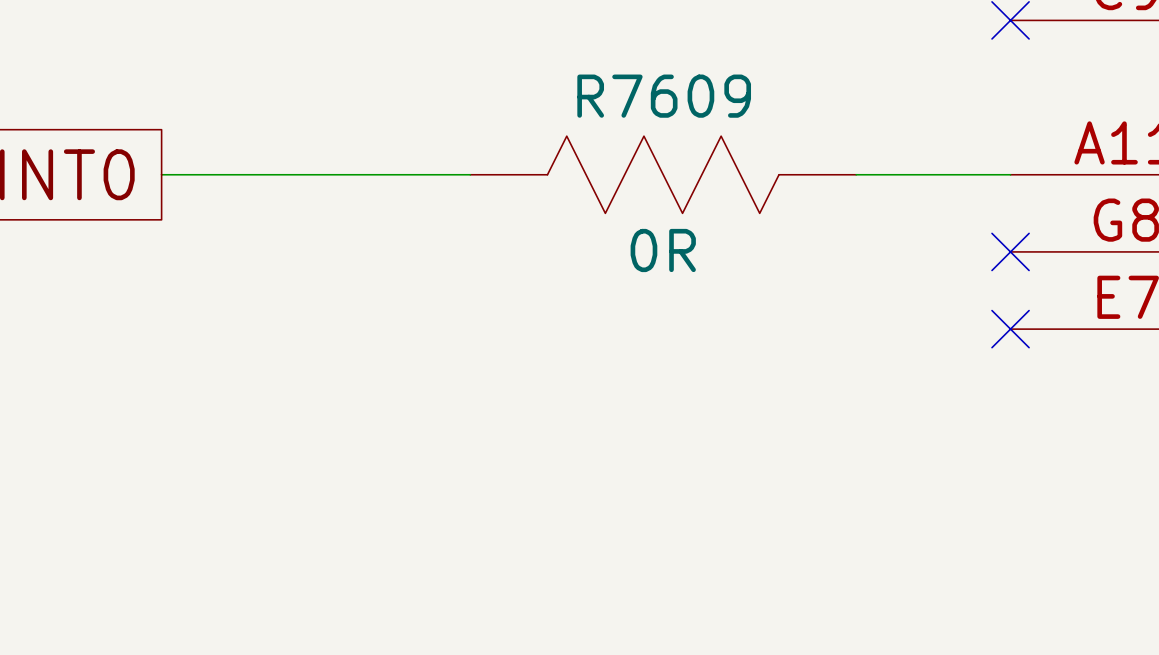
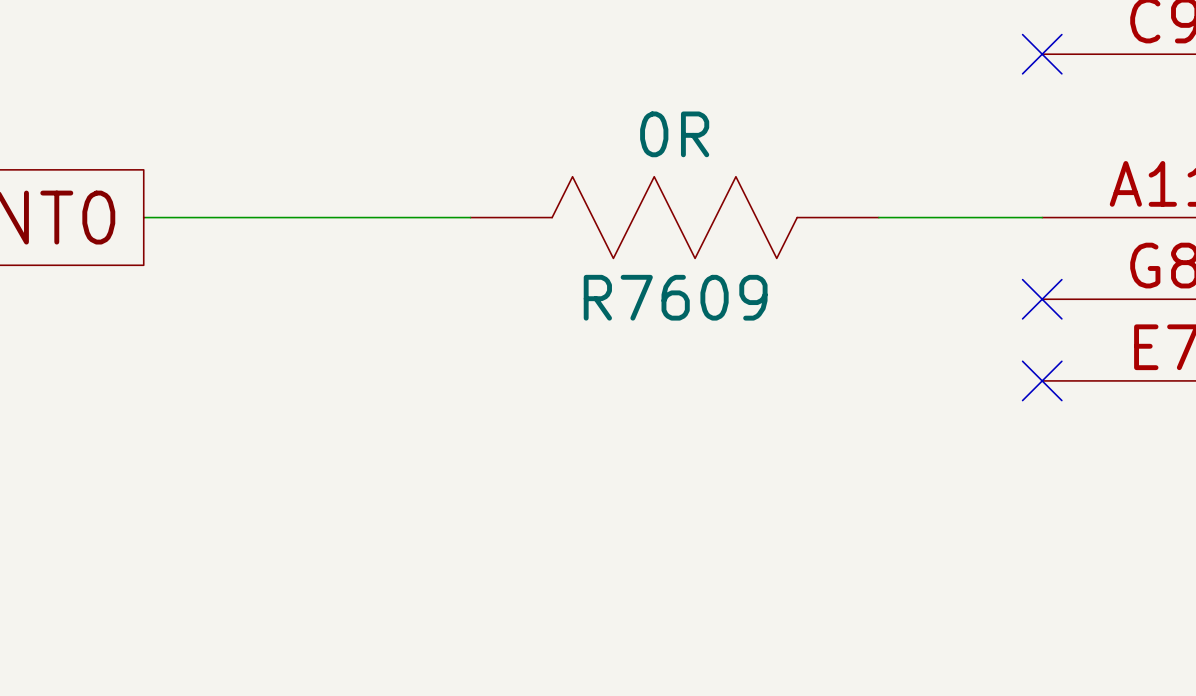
R7609 name position: R7609 (664, 96) -> R7609 (675, 297)
R7609 value position: 0R (663, 250) -> 0R (674, 134)

